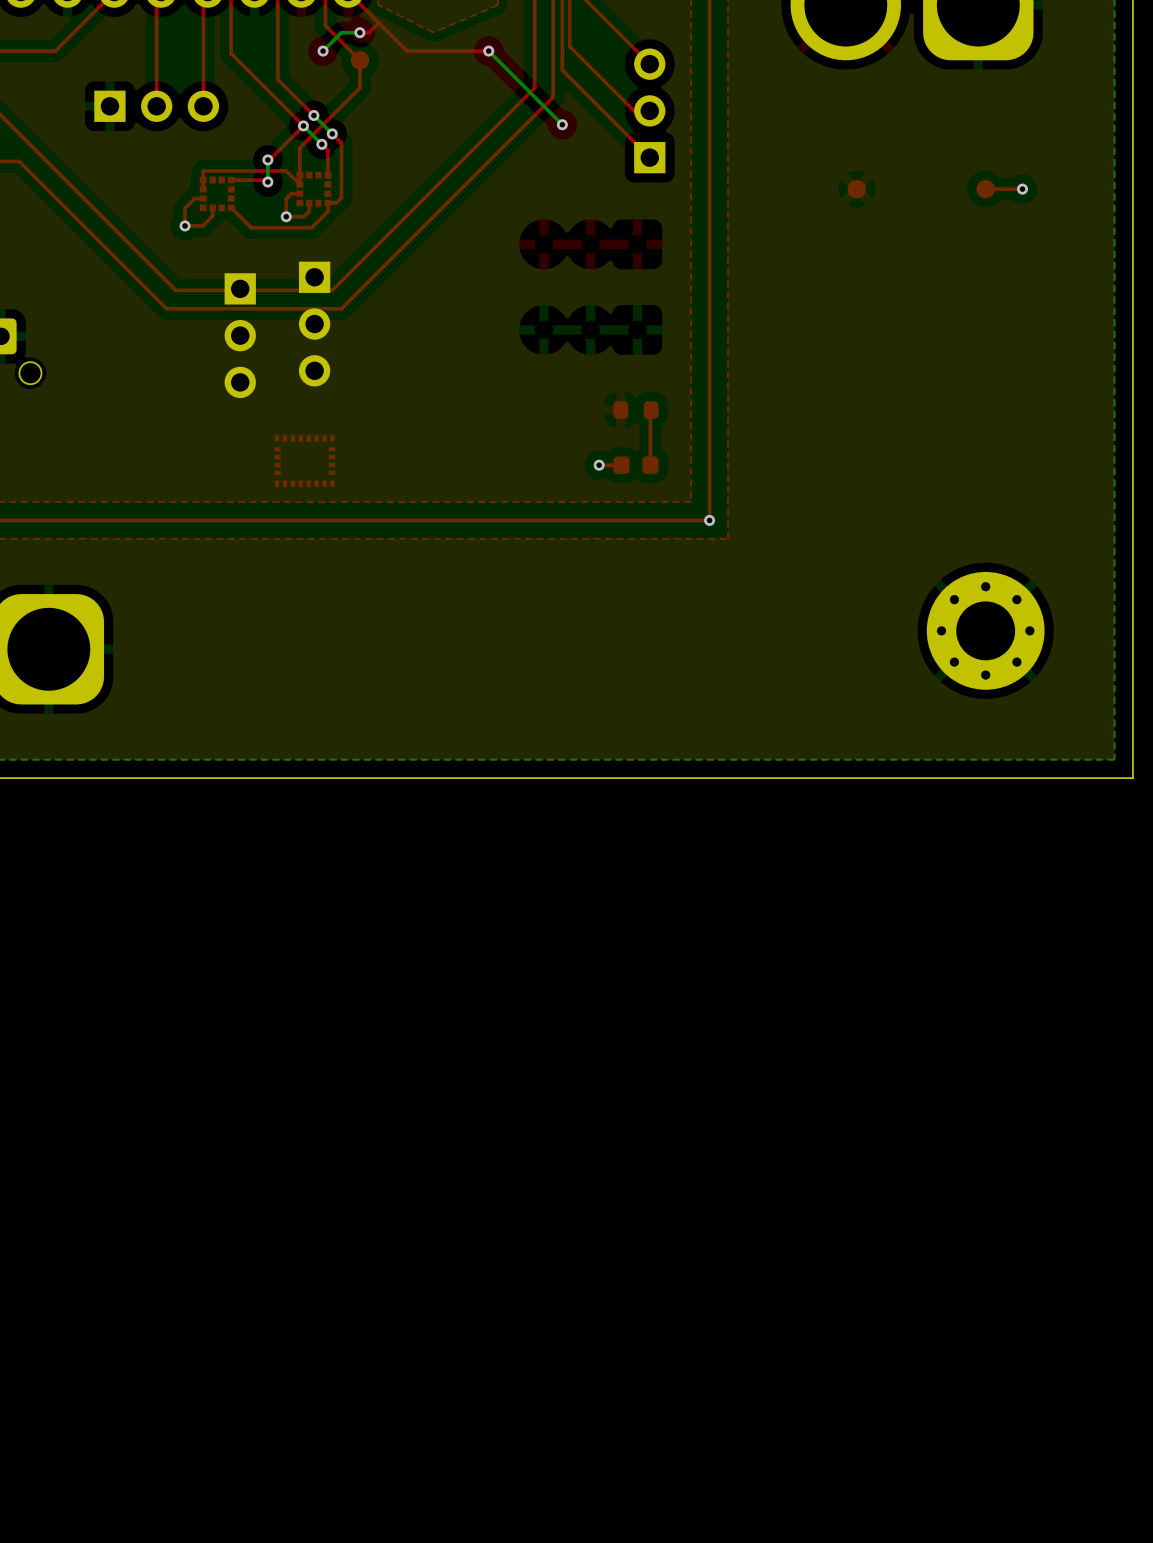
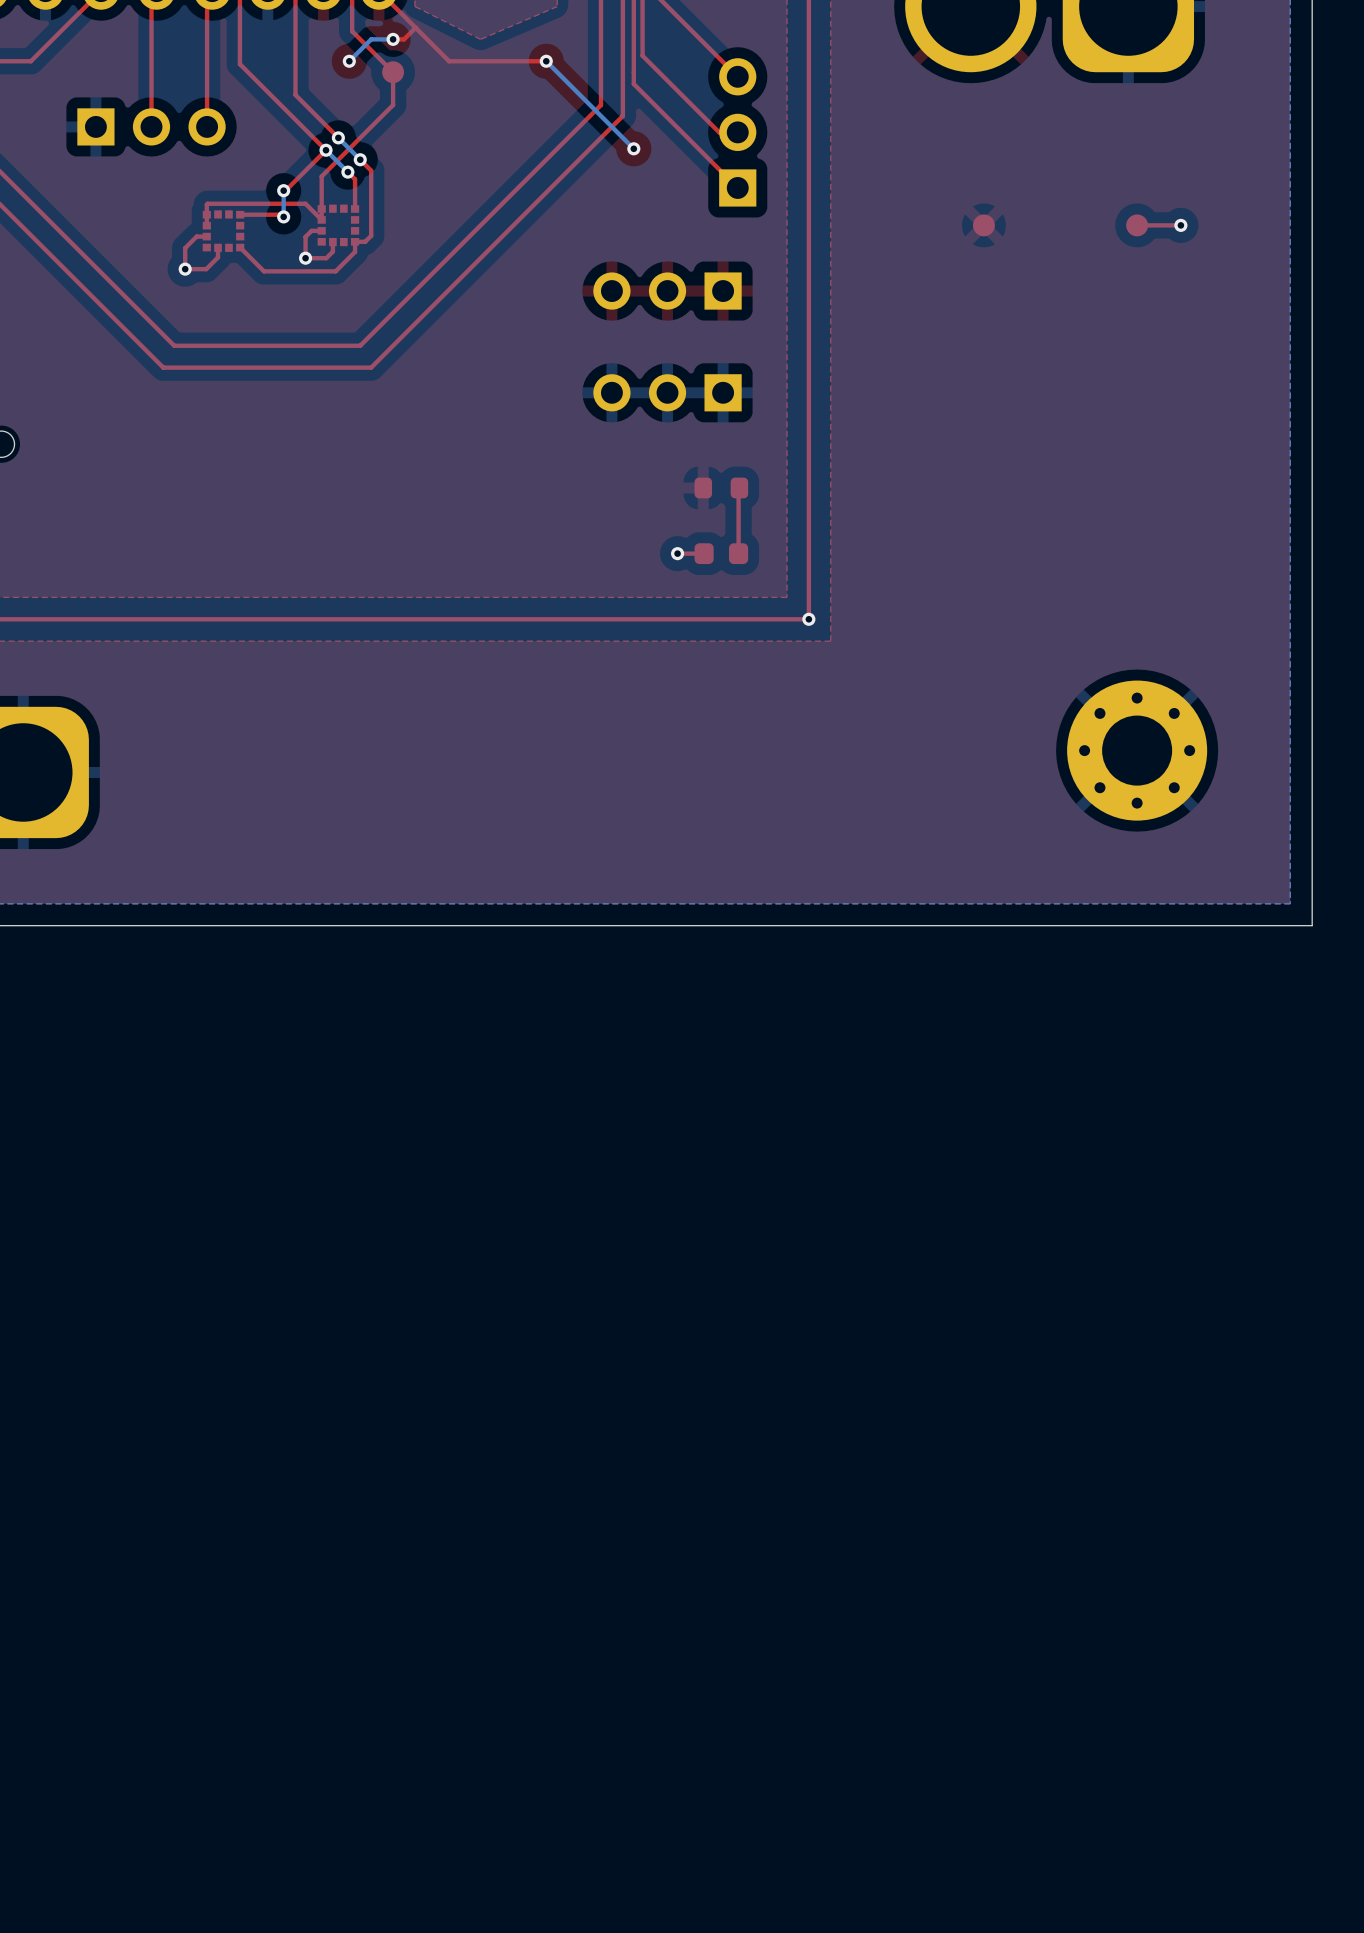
part: none -> (667, 291)
part: (314, 324) -> none
part: none -> (667, 392)
part: (240, 335) -> none
part: (304, 461) -> none

